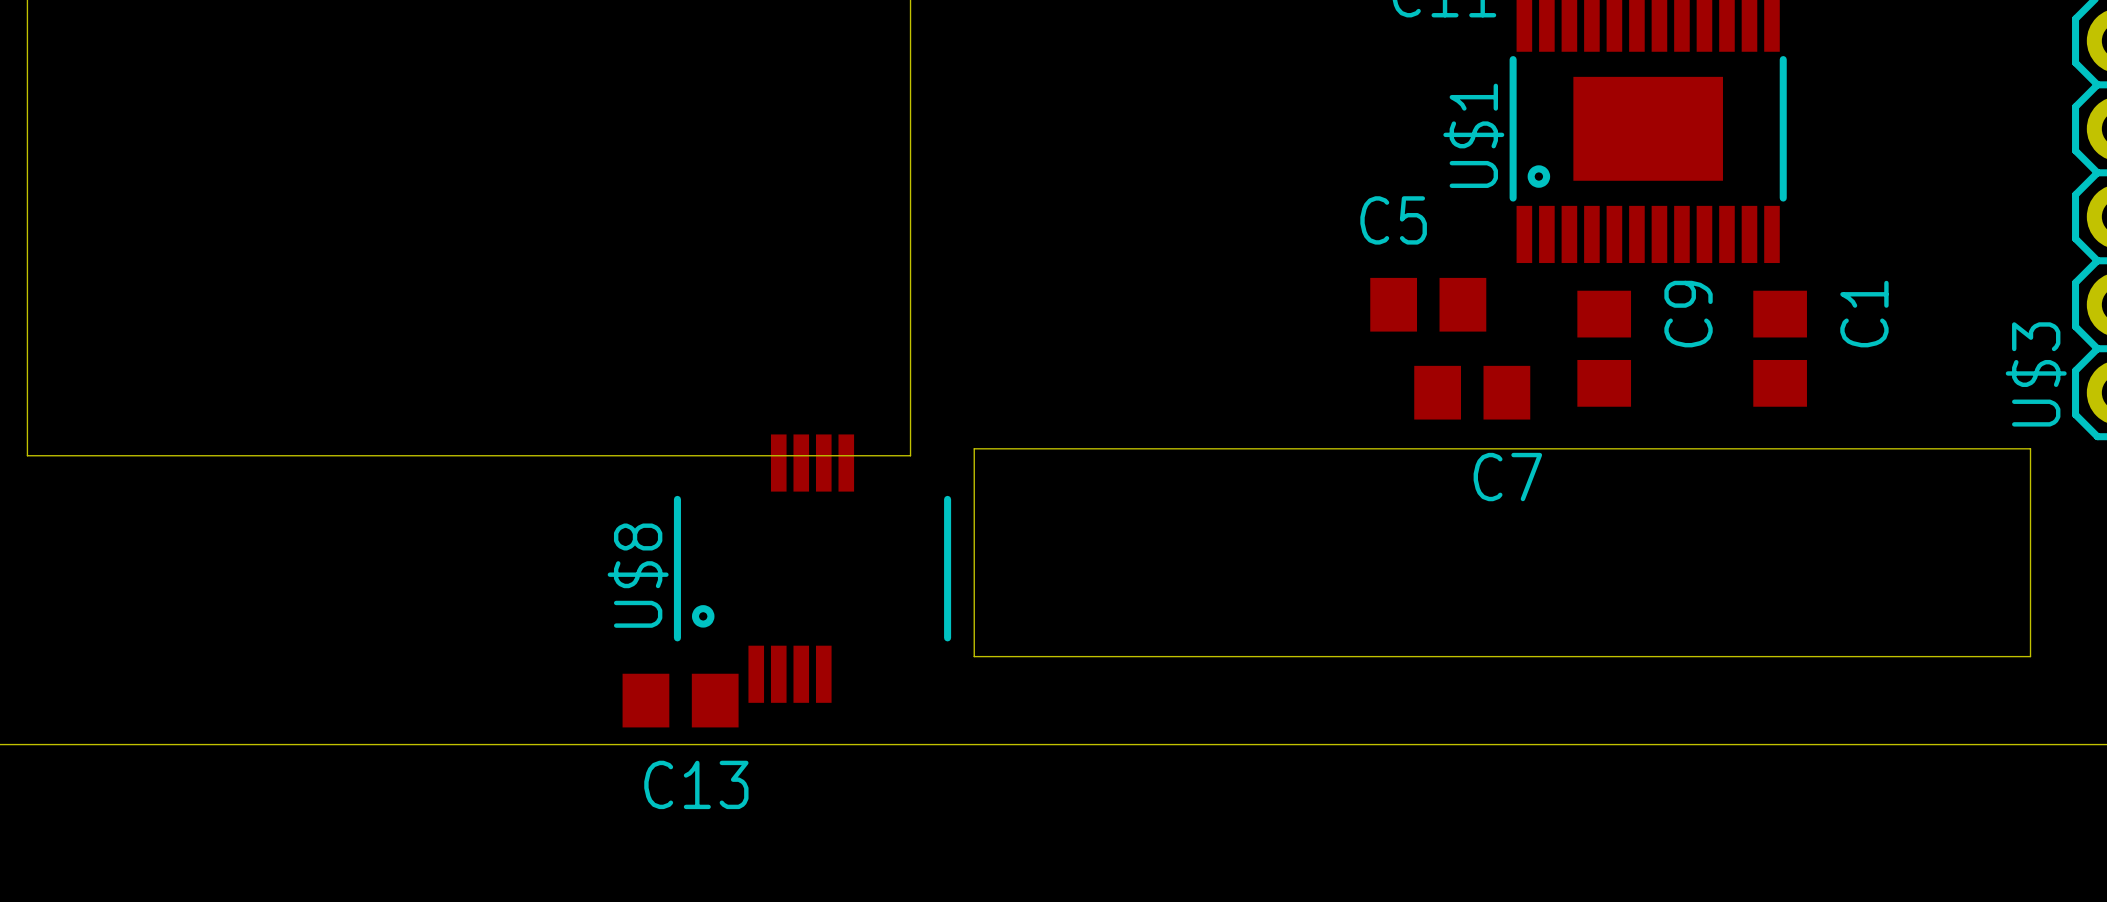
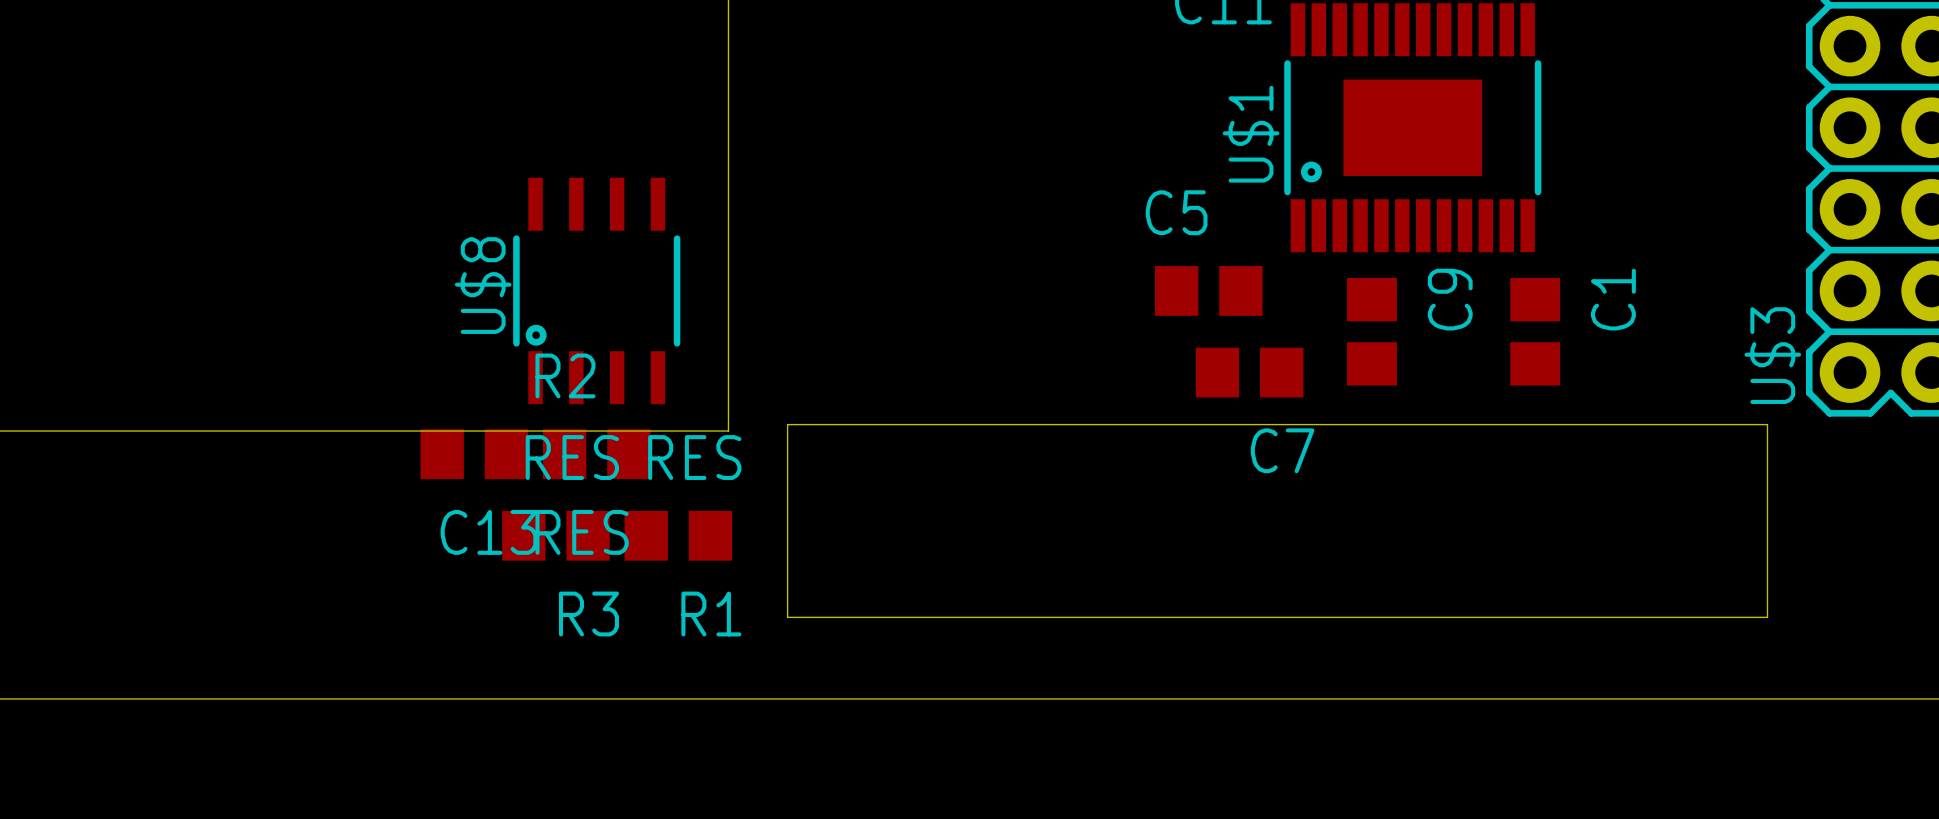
U$8 footprint: [673, 434, 952, 703] -> [513, 177, 681, 405]
R2: none -> RES (596, 454)
R3: none -> RES (555, 535)
R1: none -> RES (678, 535)
C13 position: (680, 700) -> (474, 454)

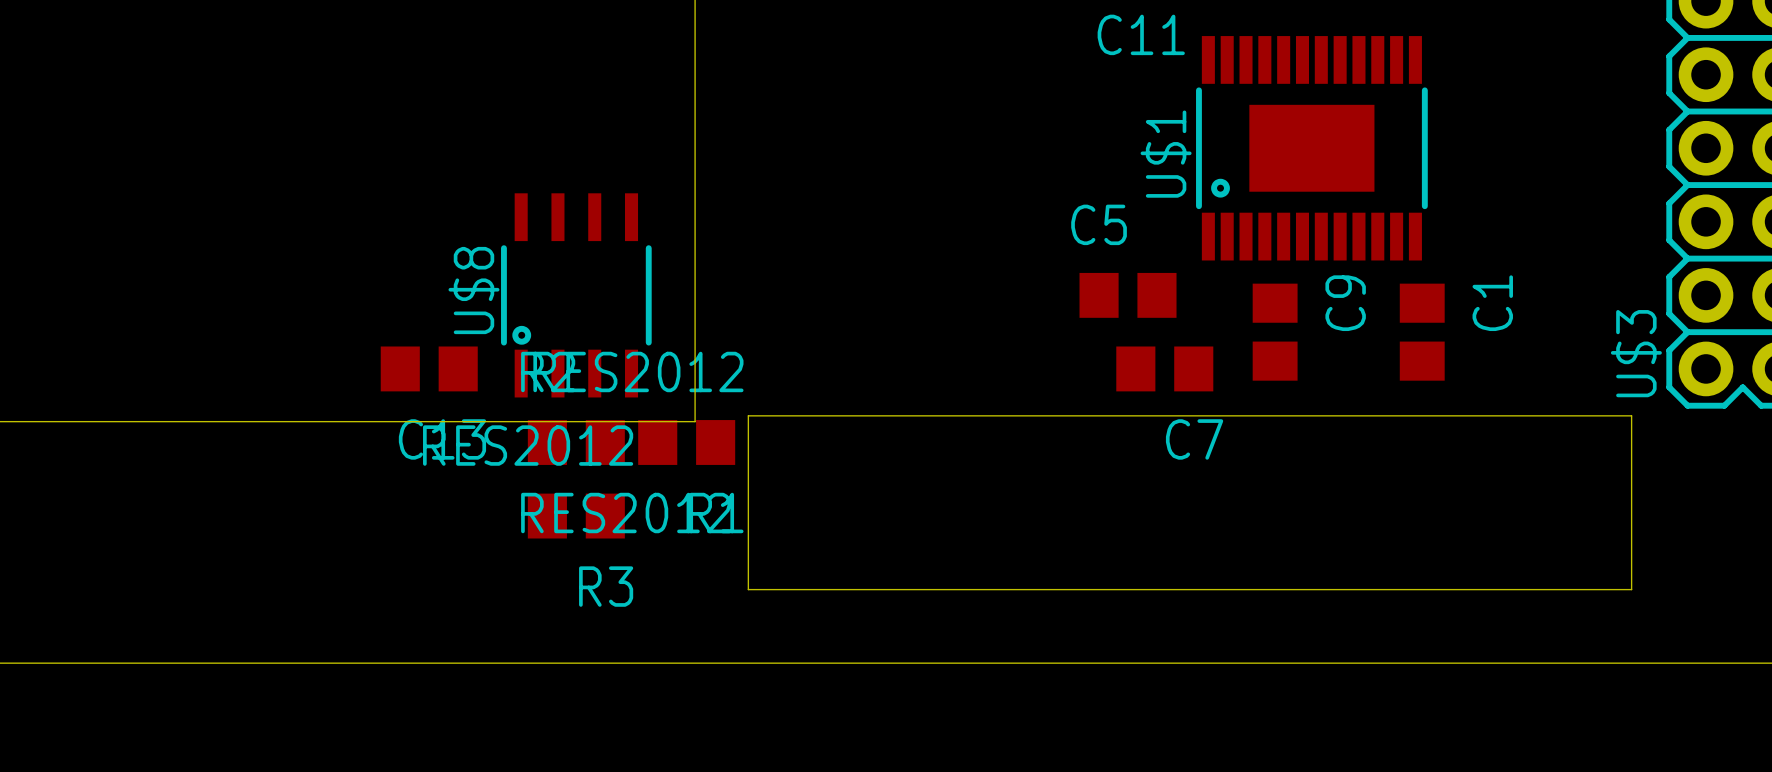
C13 position: (474, 454) -> (429, 368)
R3 value: RES (572, 457) -> RES2012 (528, 445)
R1 value: RES (694, 457) -> RES2012 (638, 371)
R2 value: RES (582, 532) -> RES2012 (626, 513)
R3 position: (555, 535) -> (576, 516)
R1 position: (678, 535) -> (686, 442)

